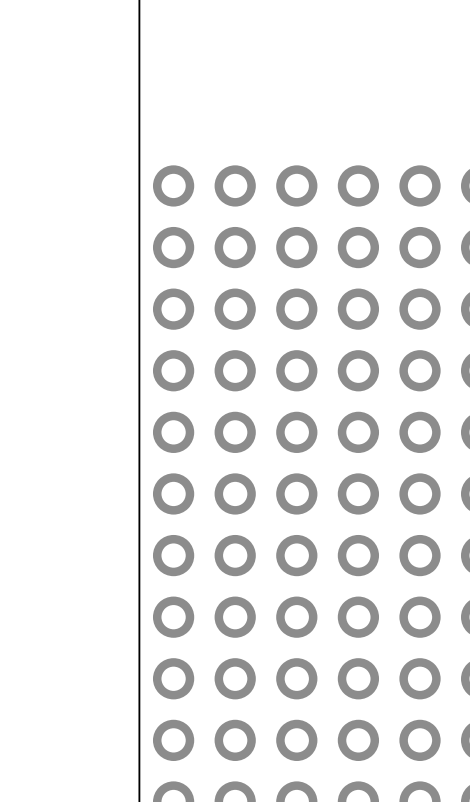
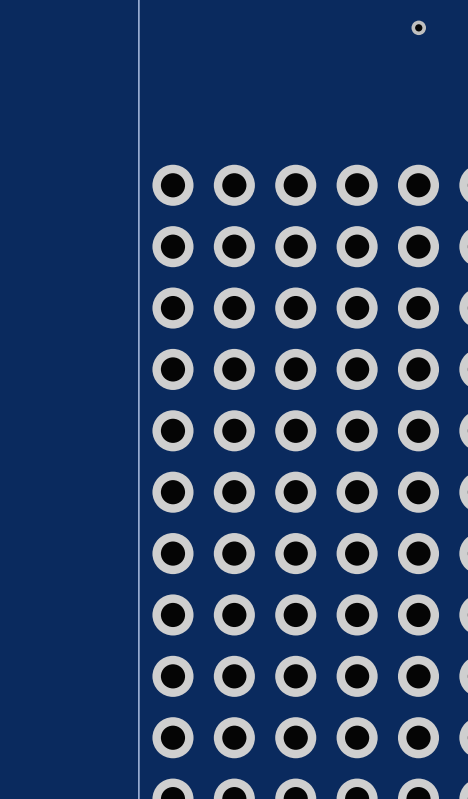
via: none -> (418, 27)

